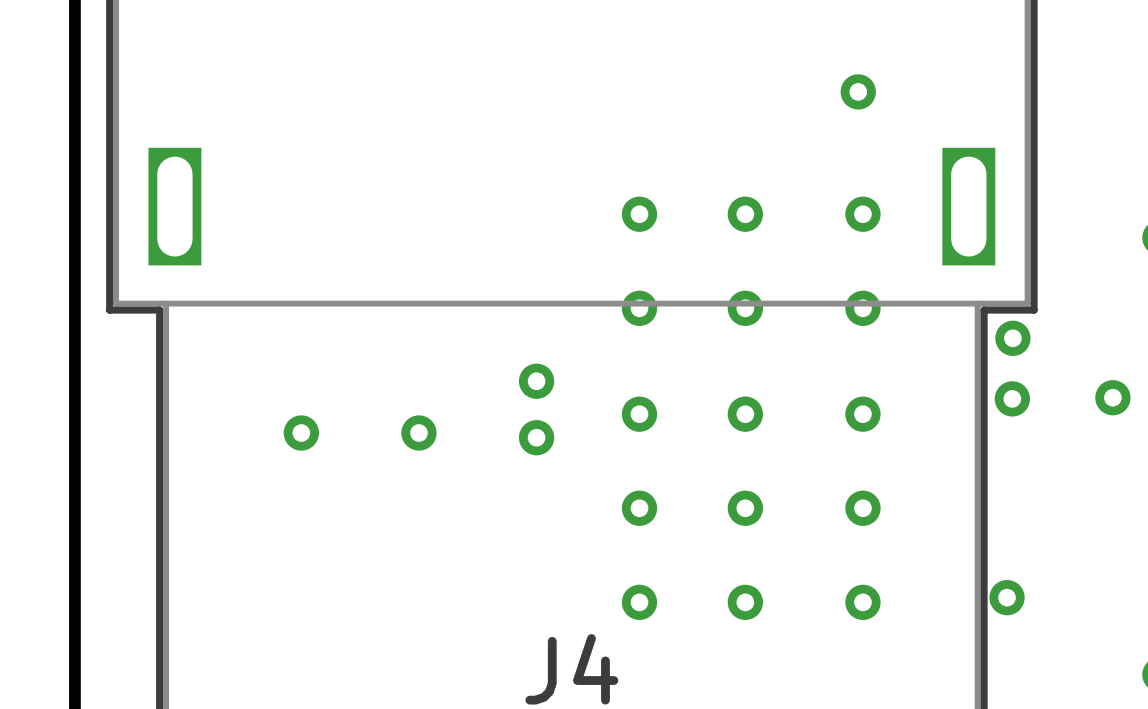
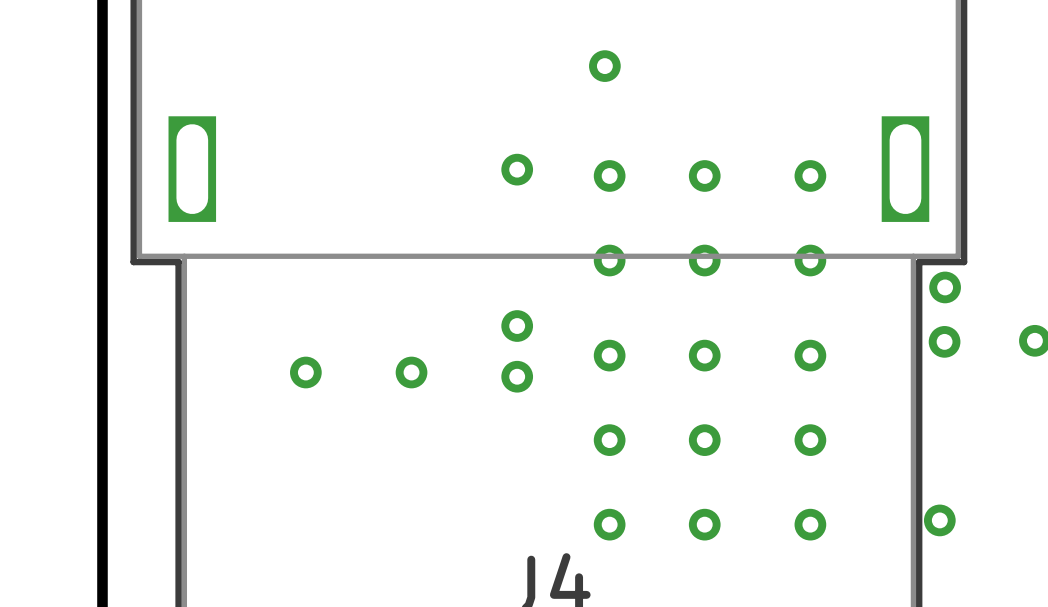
via: none -> (604, 66)
via: (858, 91) -> none
via: none -> (517, 169)

